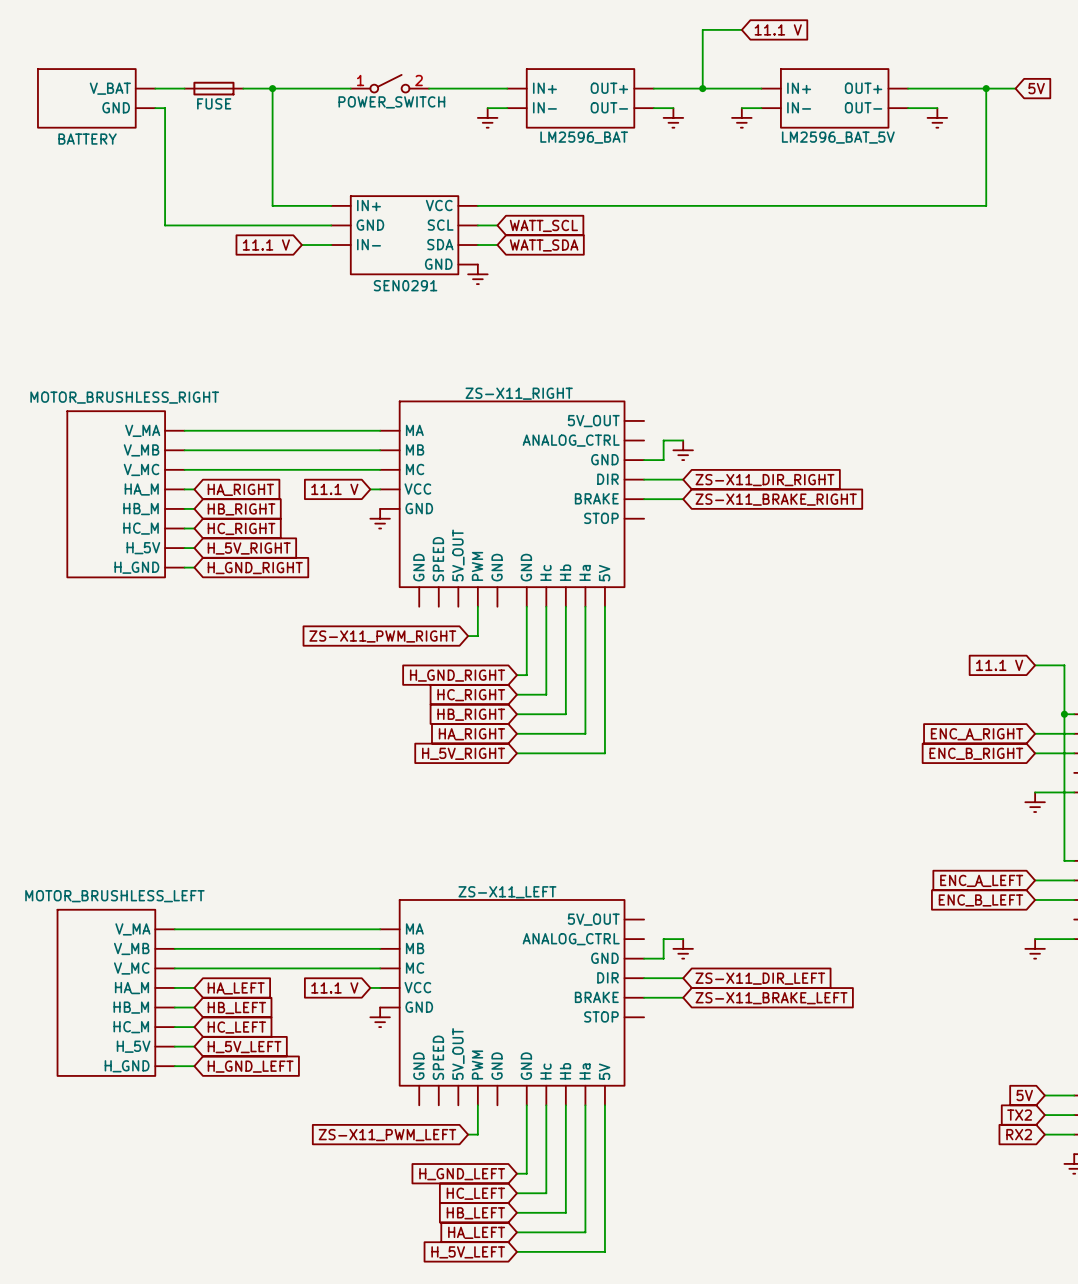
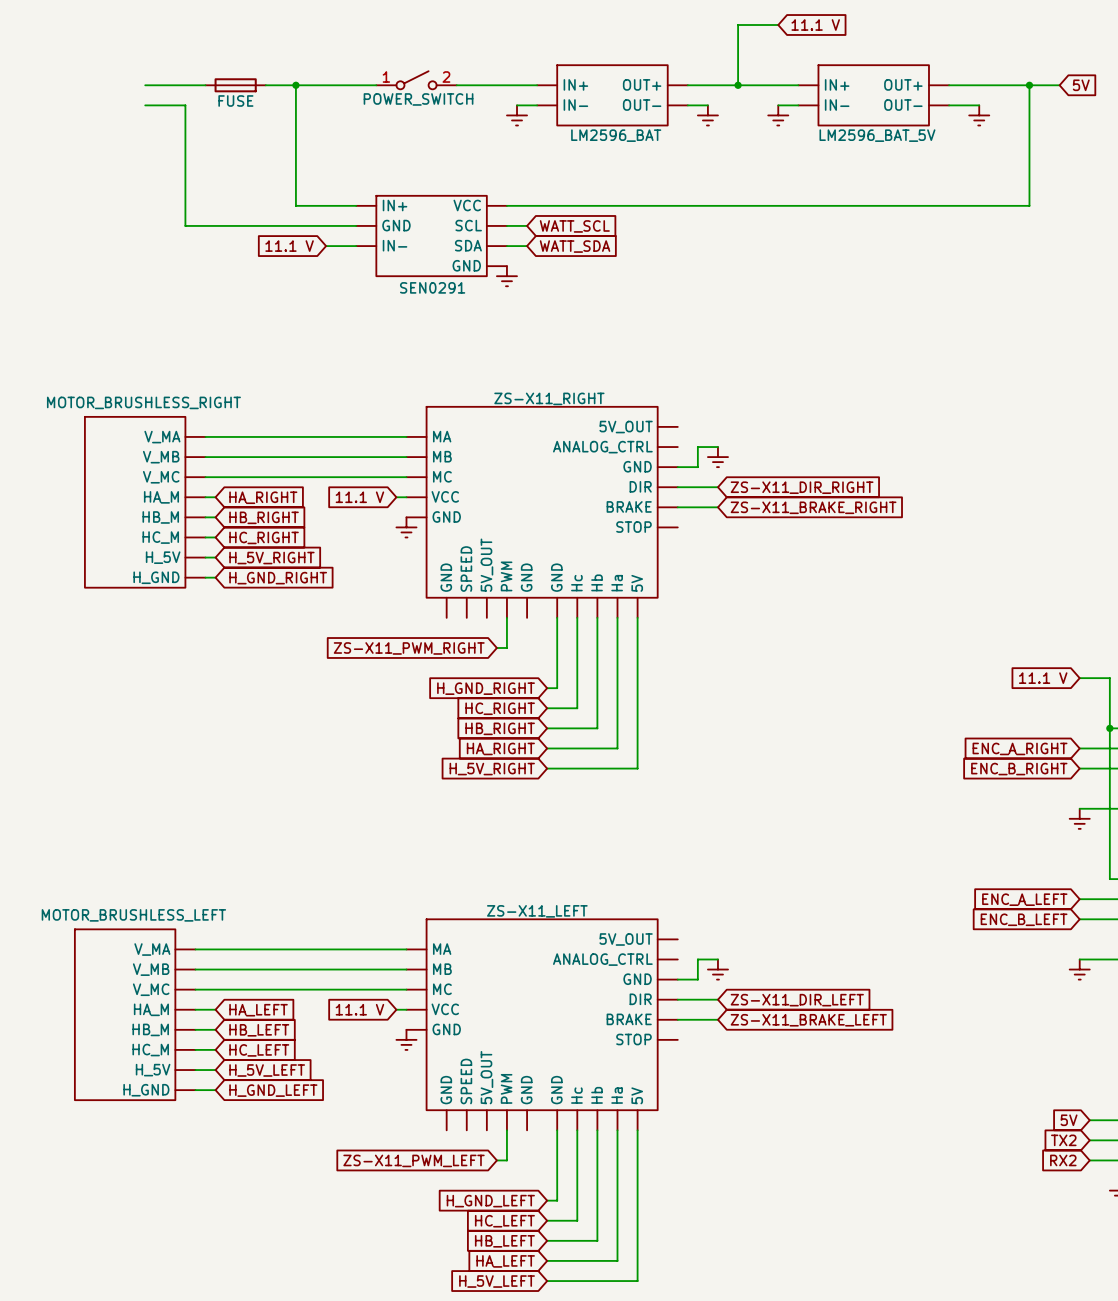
BATTERY: (96, 98) -> none

